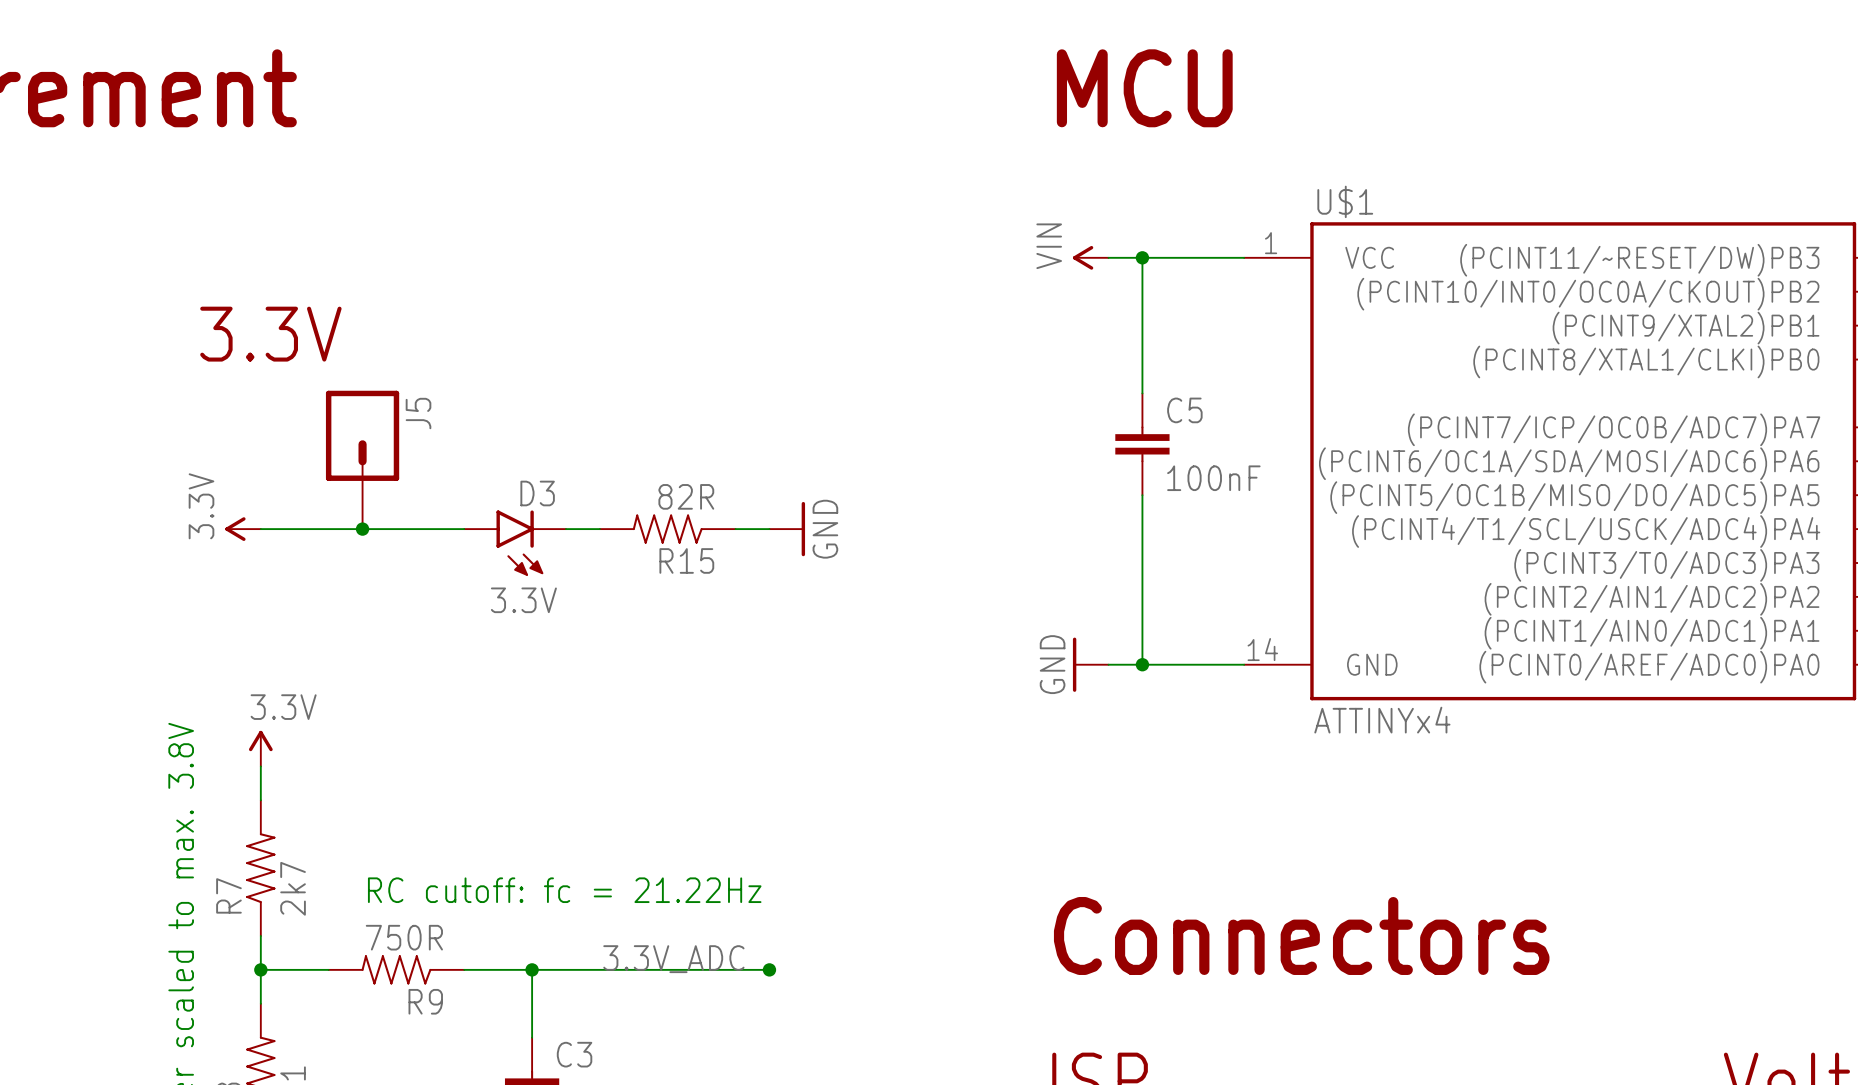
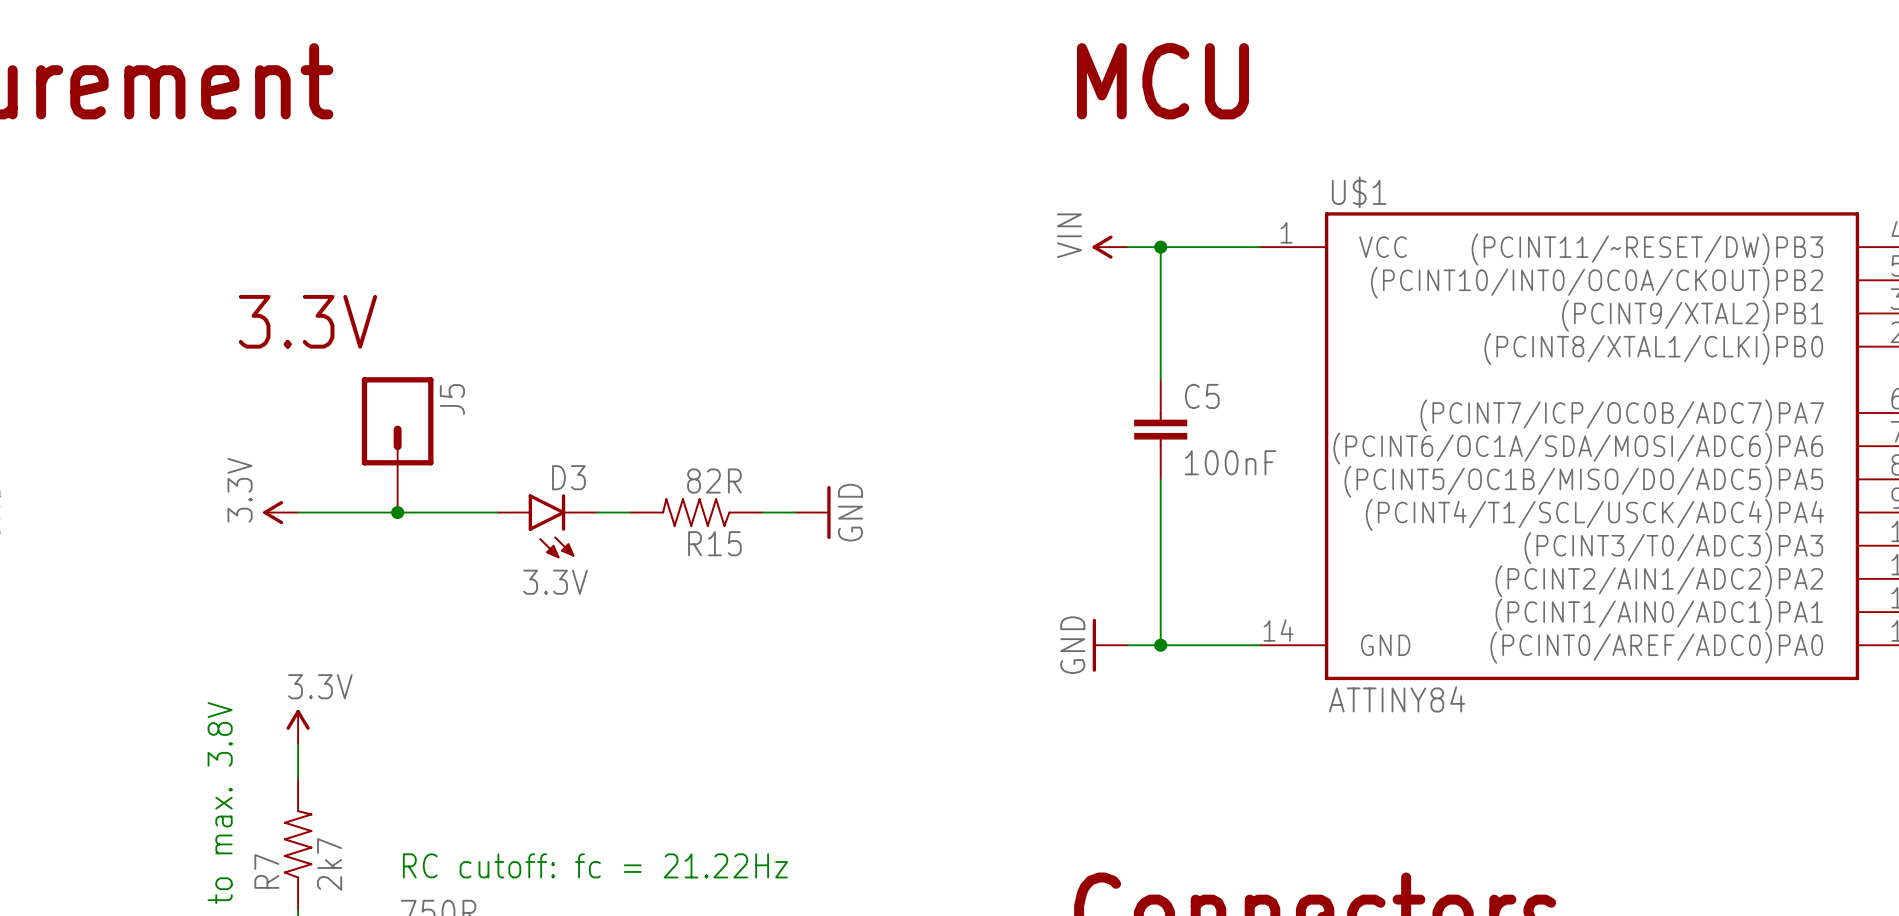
U$1 value: ATTINYx4 (1382, 720) -> ATTINY84 (1396, 699)

